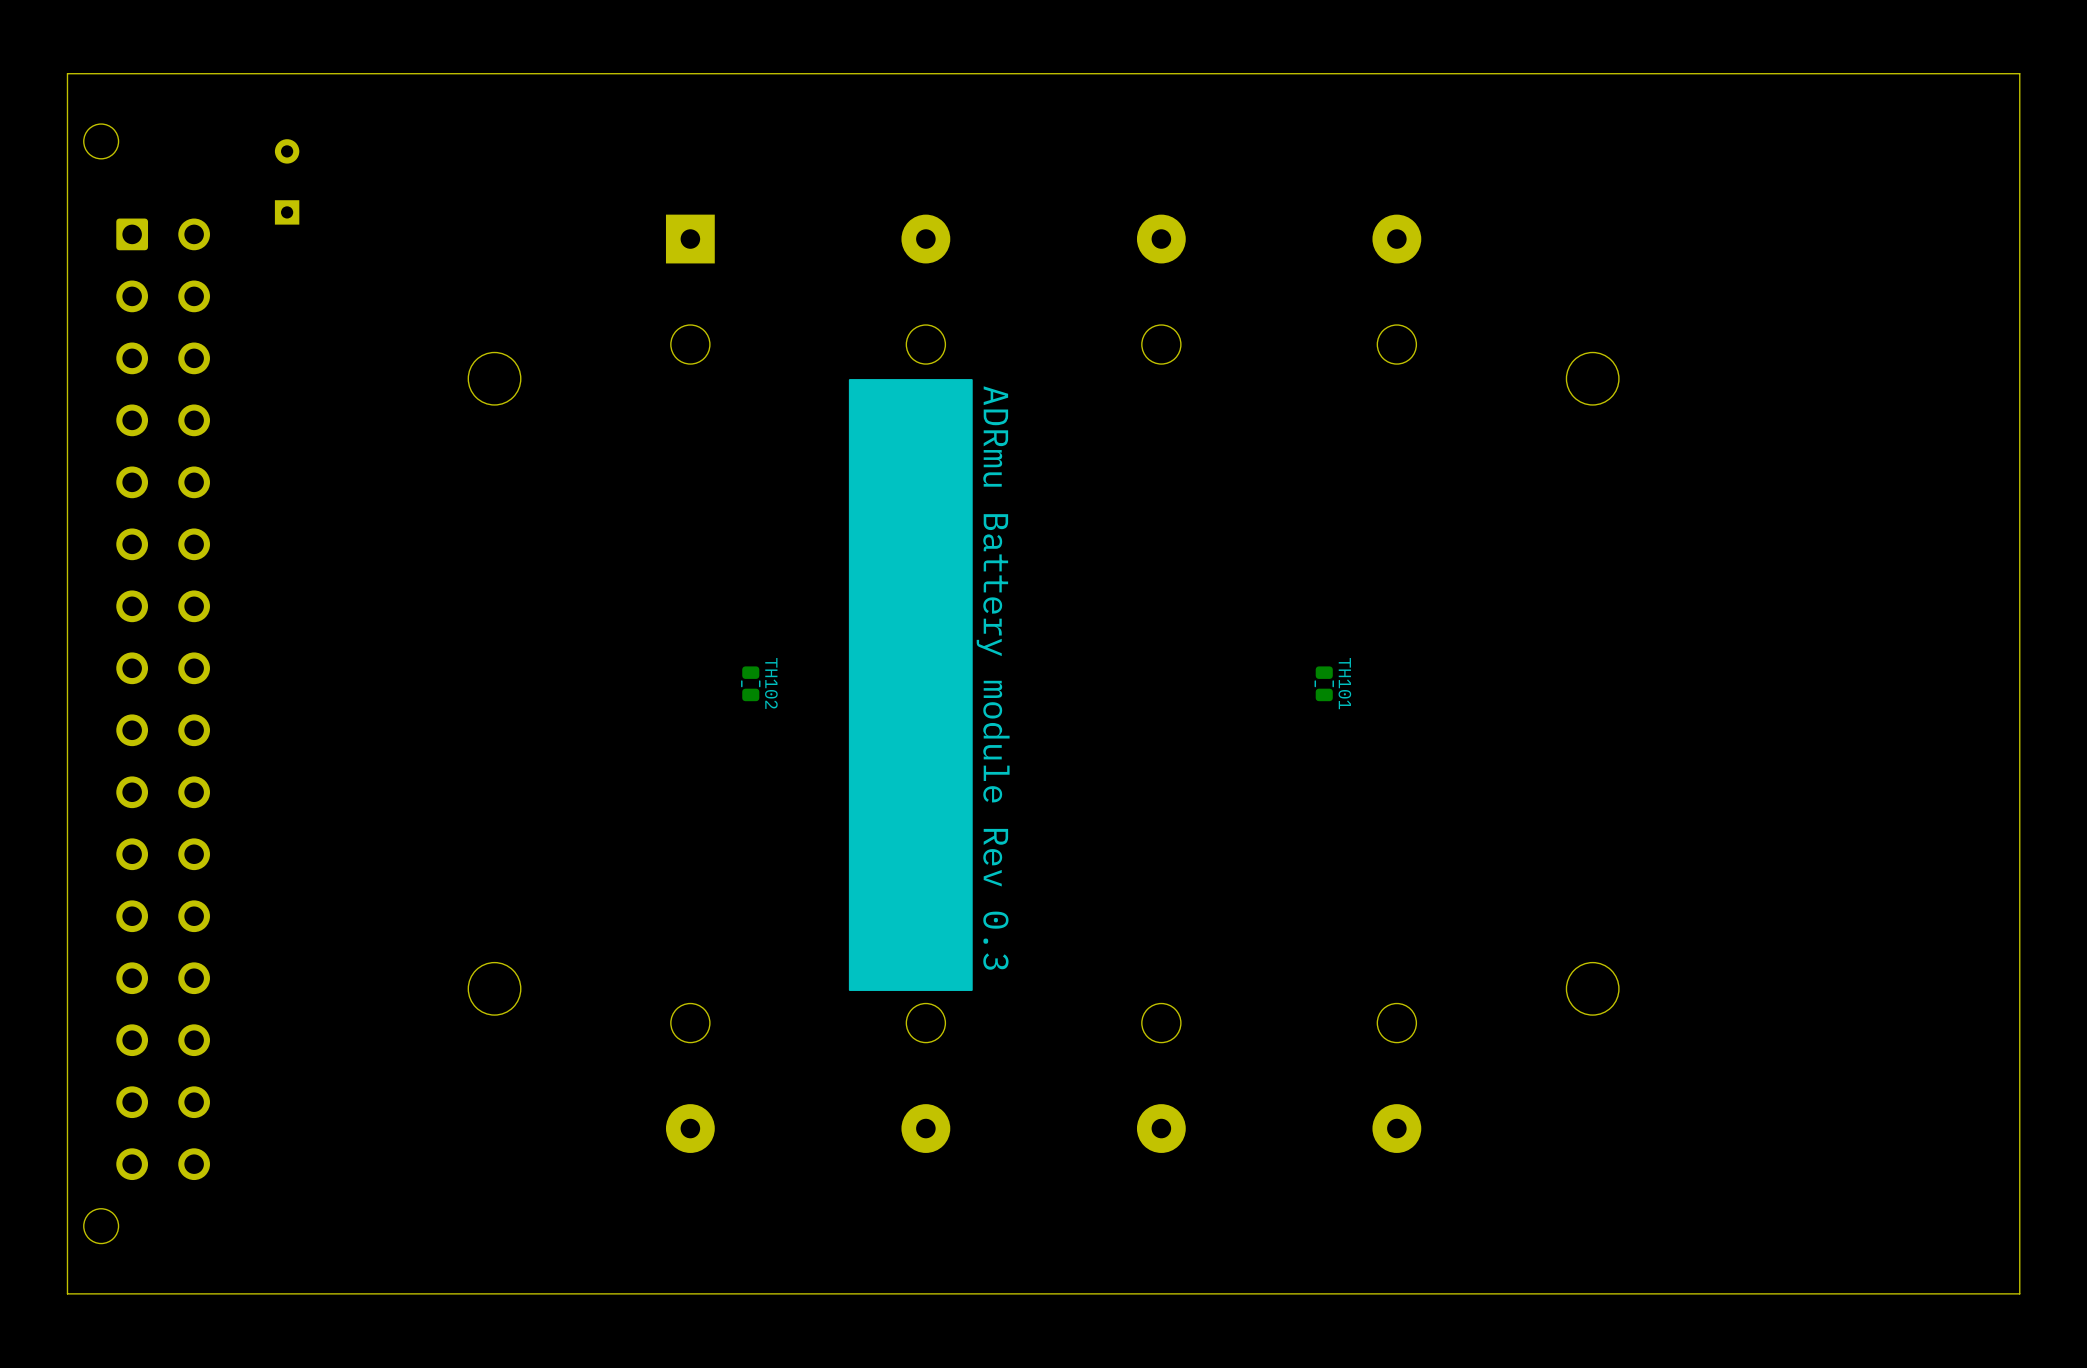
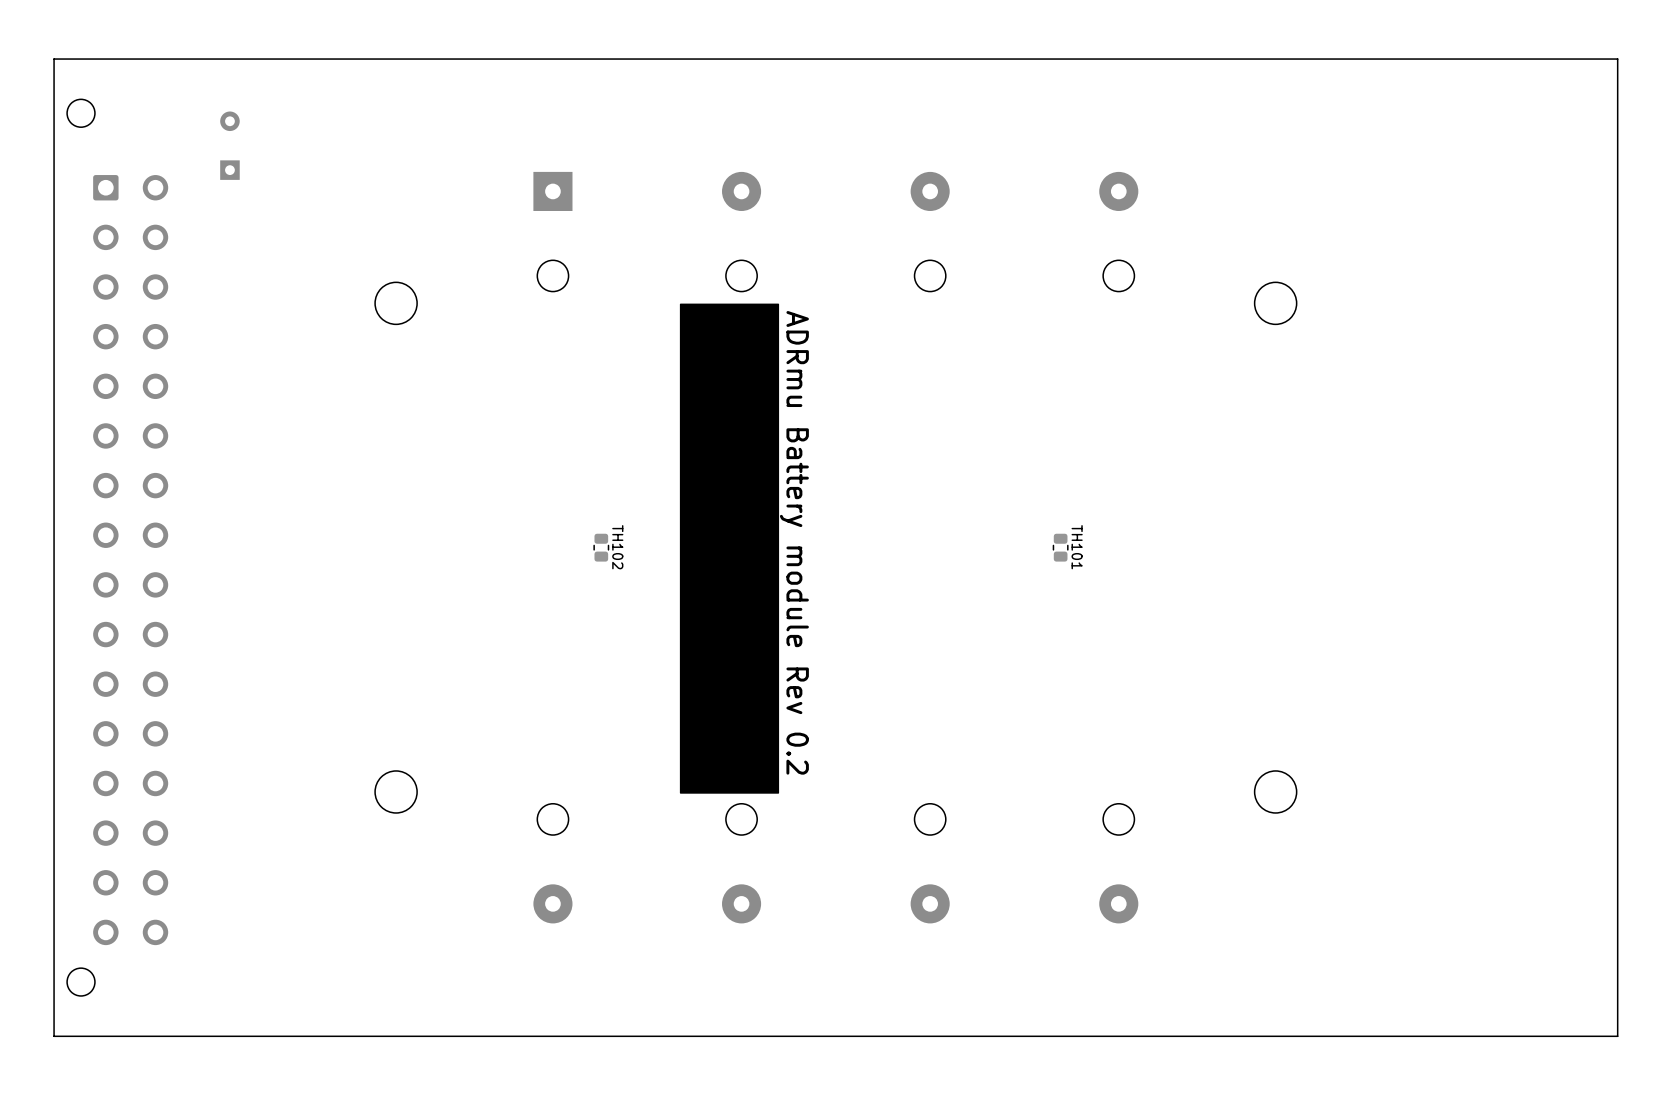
text: ADRmu Battery module Rev 0.3 (993, 678) -> ADRmu Battery module Rev 0.2 (794, 542)

